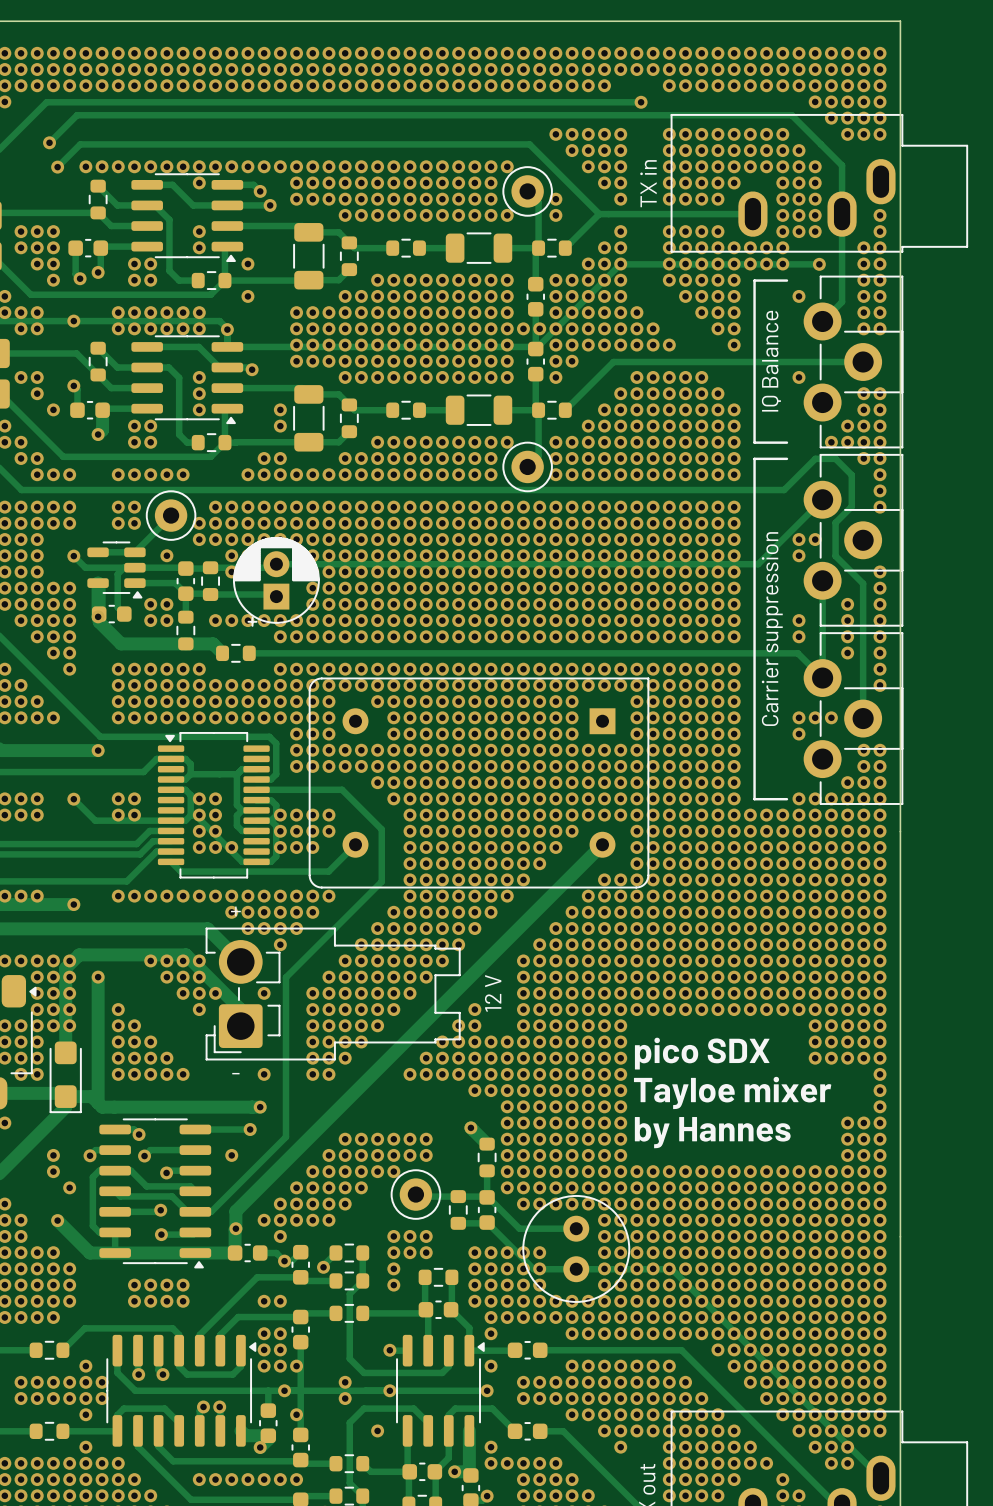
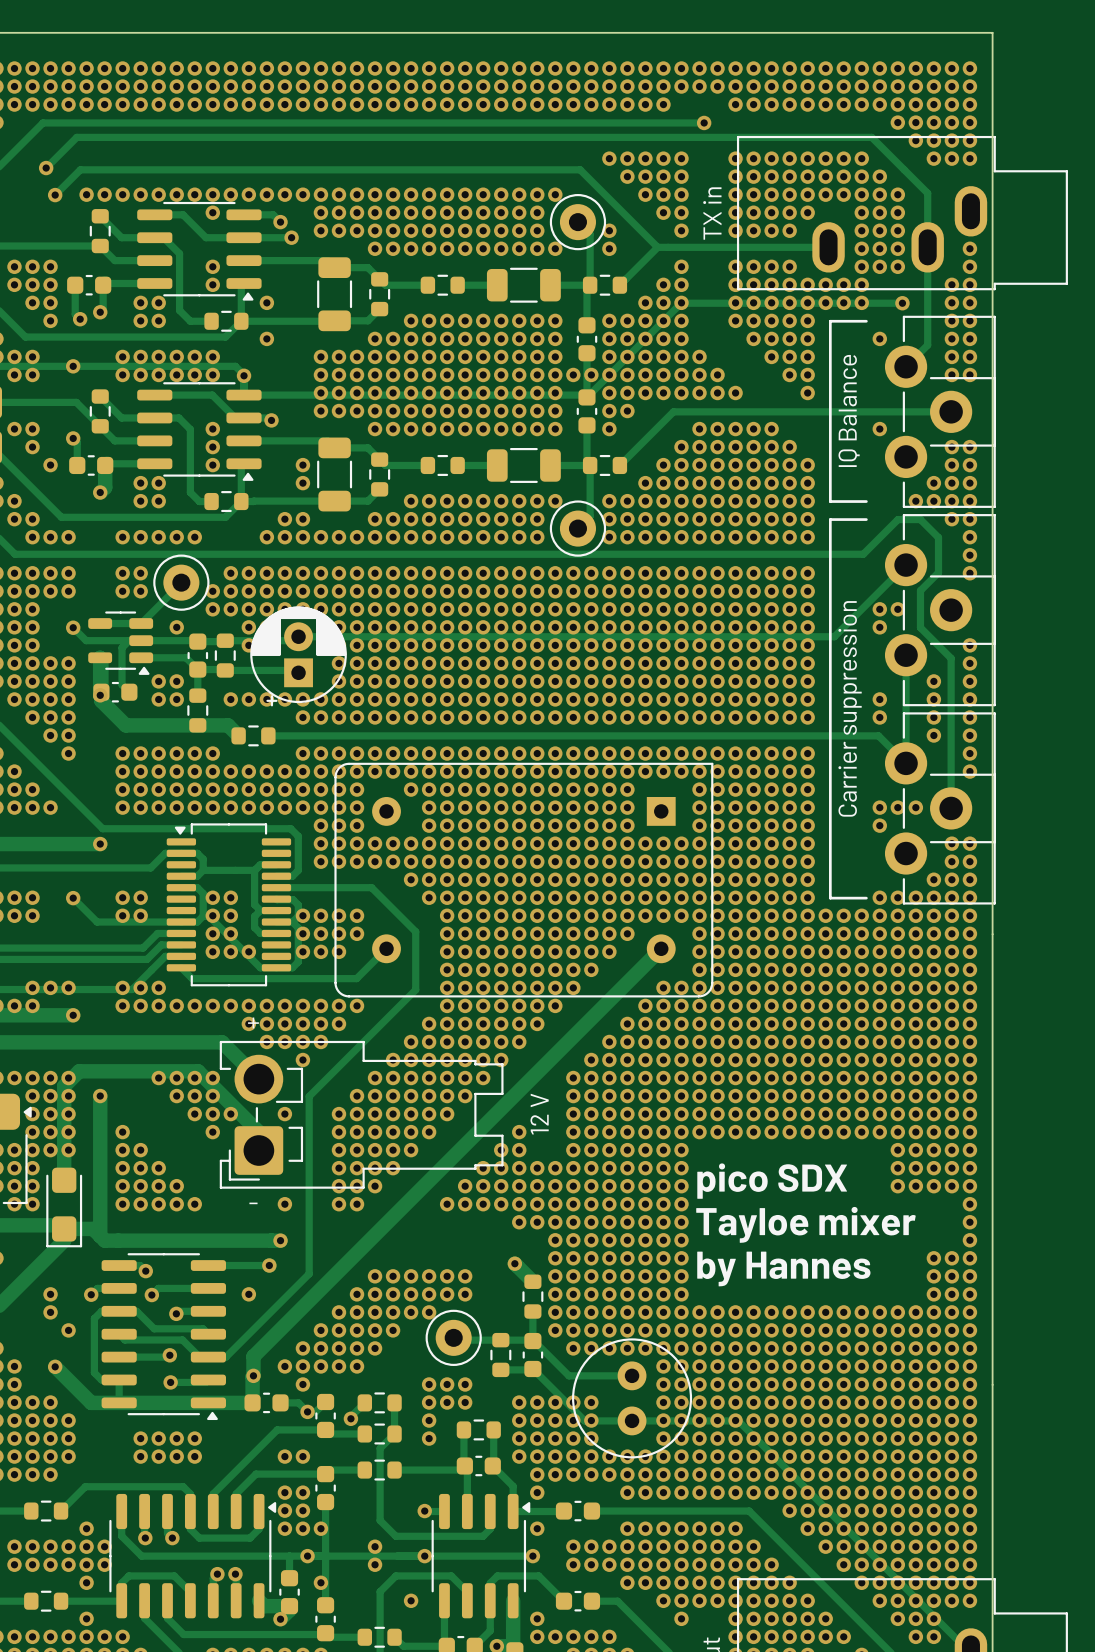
via: none -> (32, 987)
via: none -> (50, 987)
via: none -> (68, 987)
via: none -> (122, 987)
via: none -> (140, 987)
via: none -> (158, 987)

